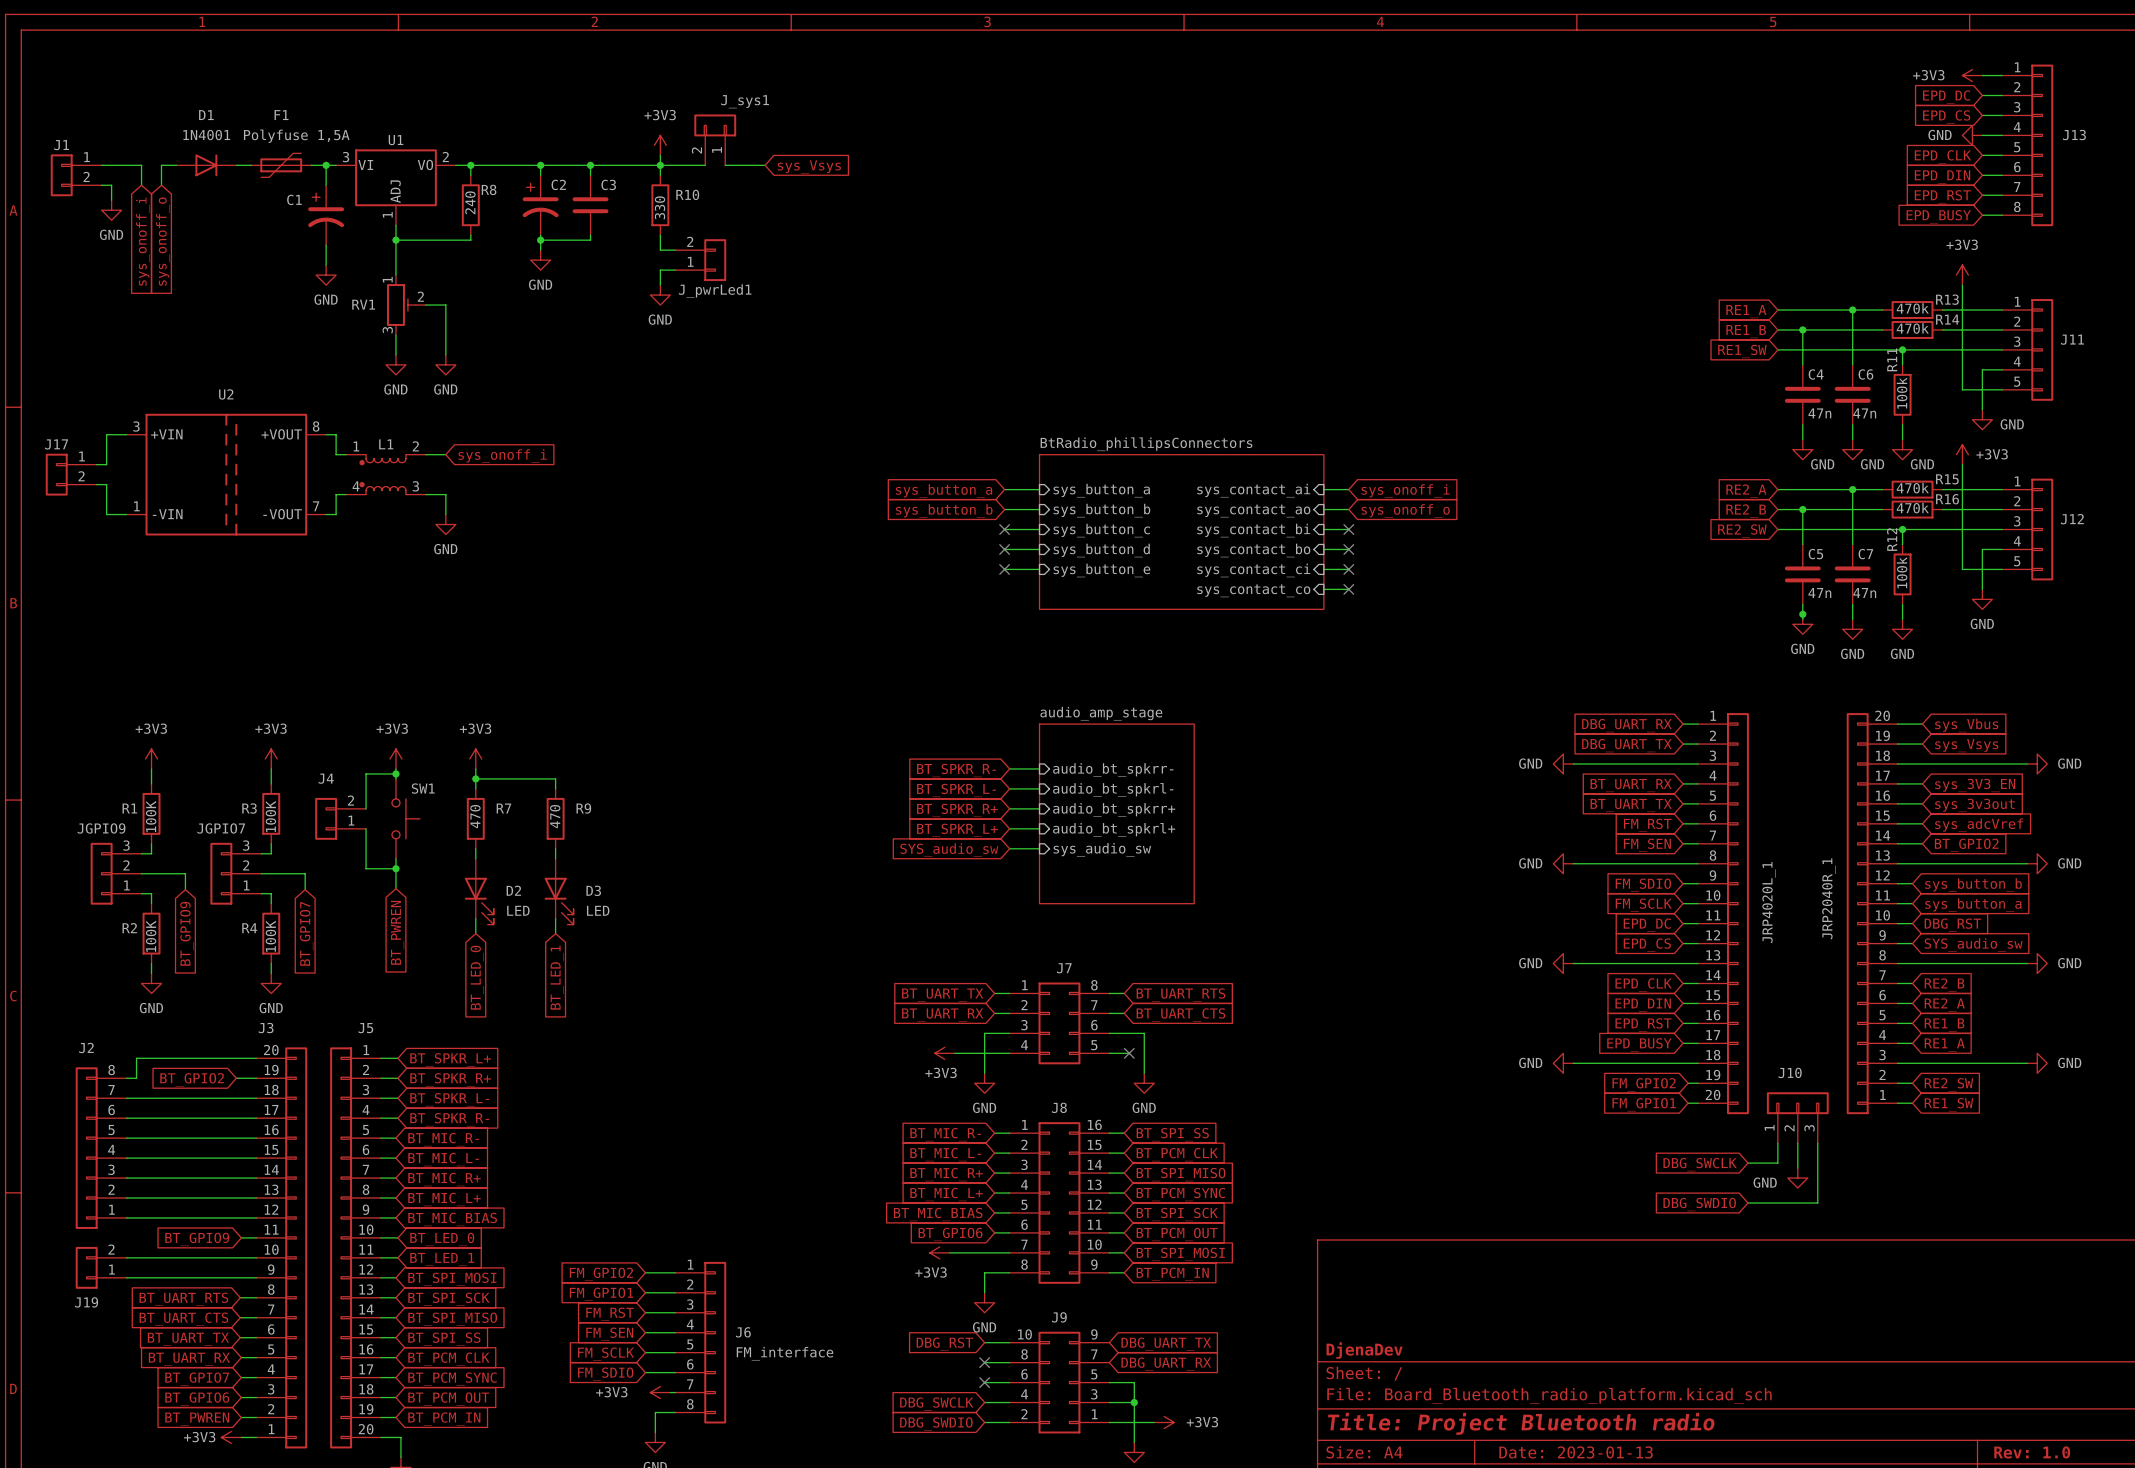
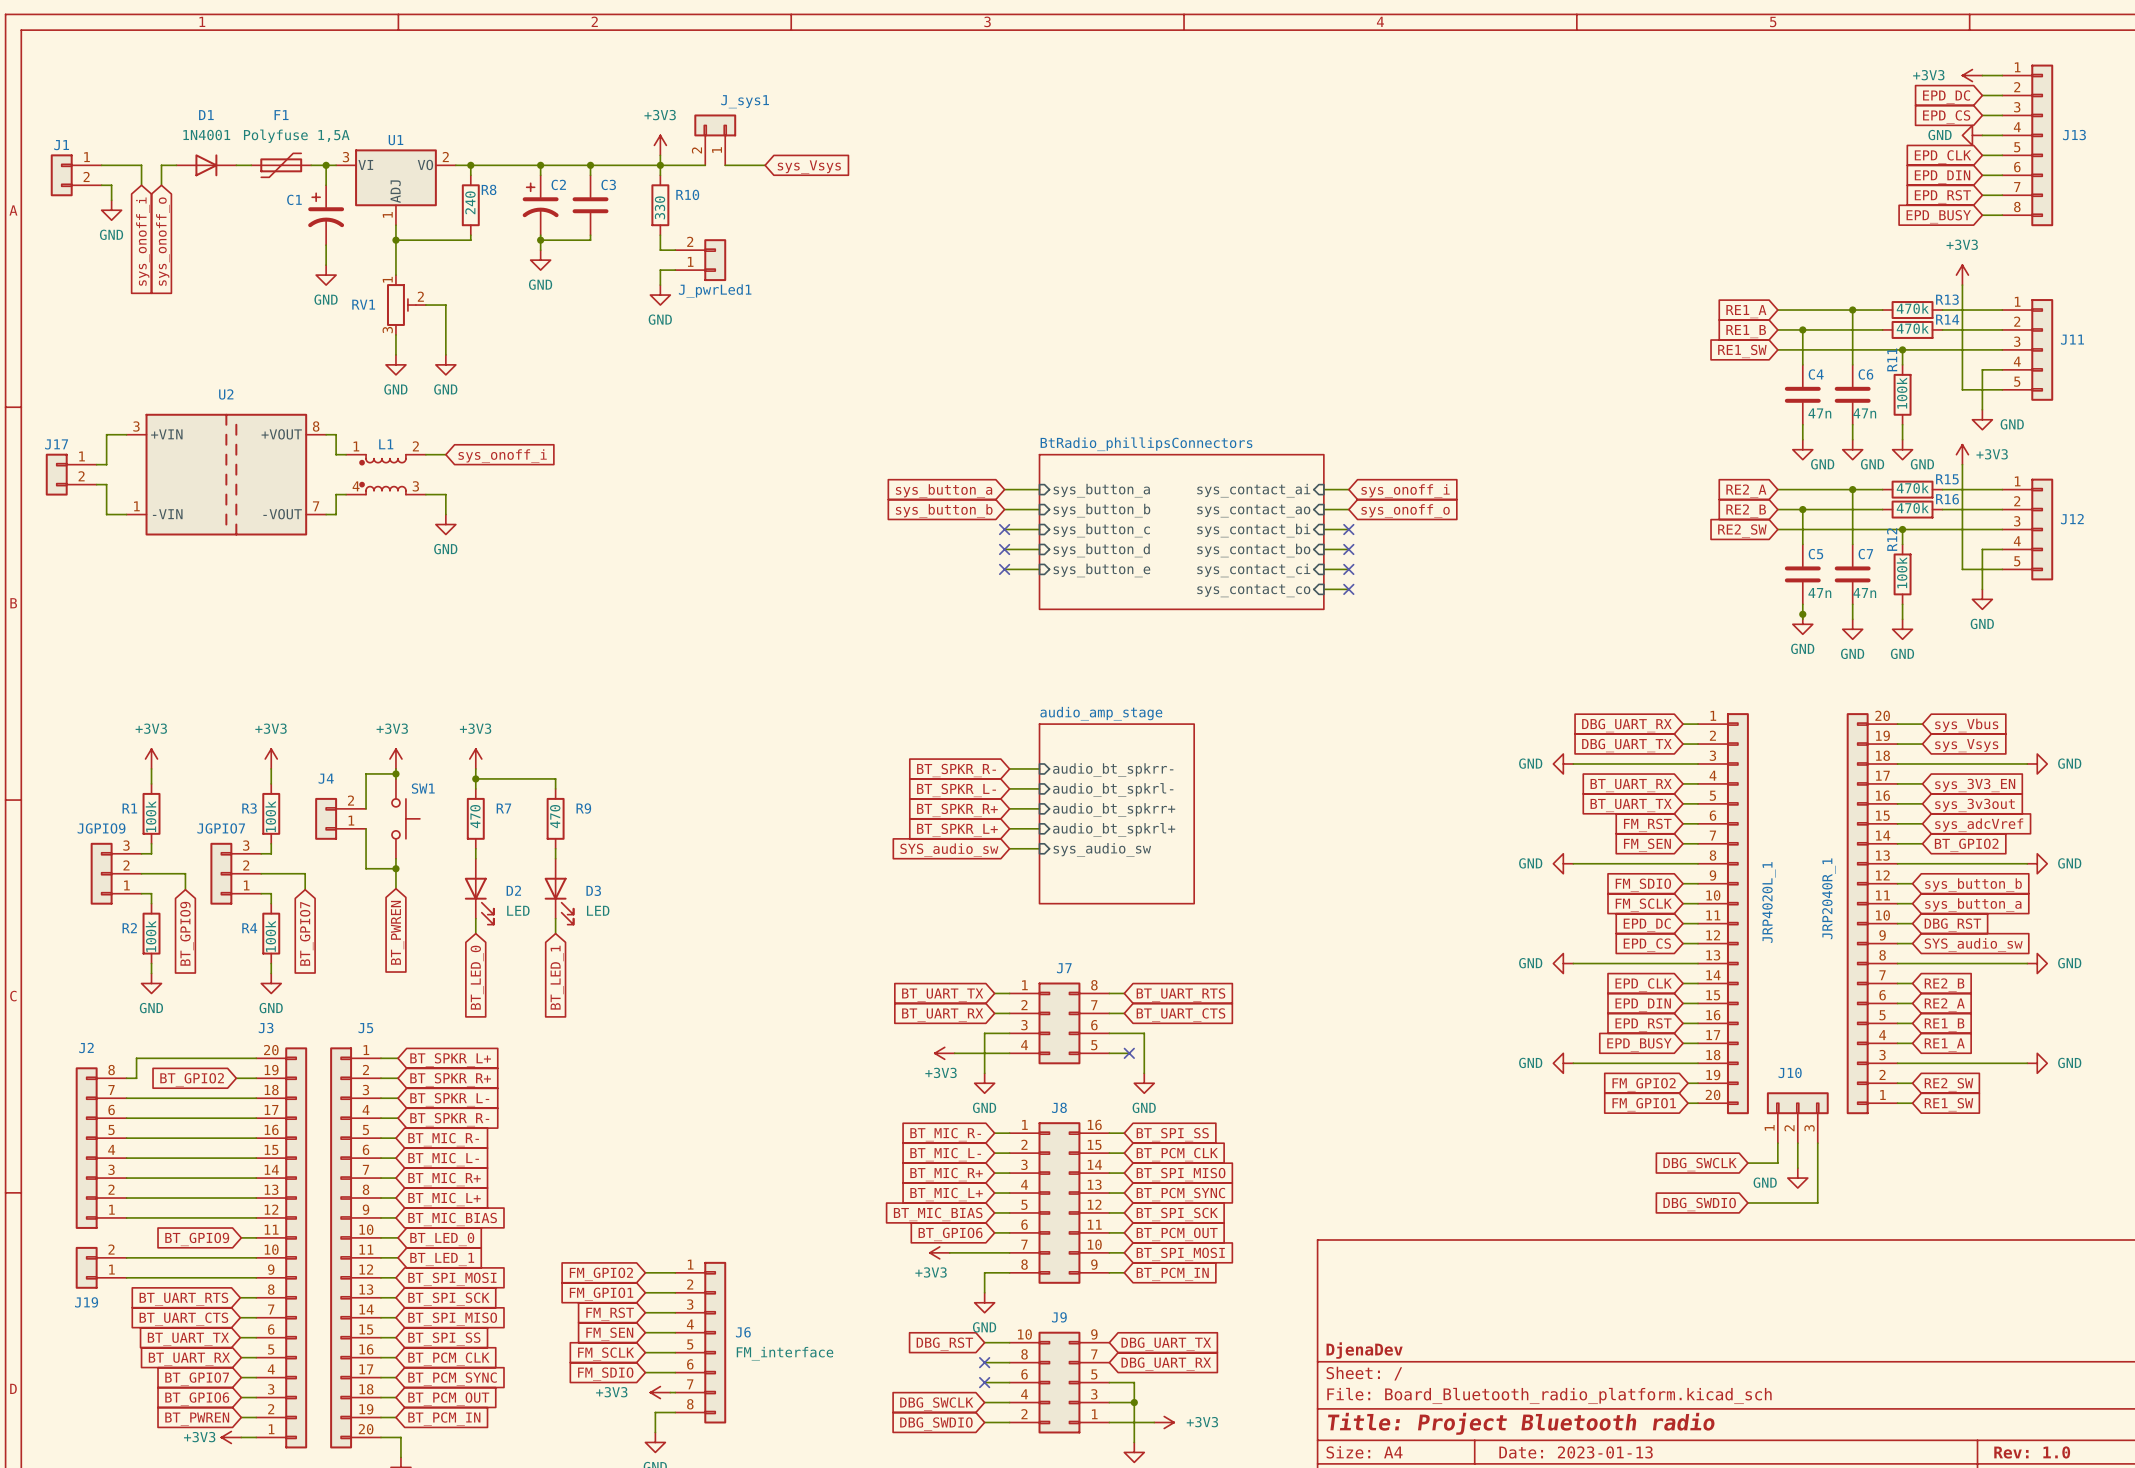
R1 value: 100K (151, 816) -> 100k (151, 816)
R3 value: 100K (270, 816) -> 100k (270, 816)
R2 value: 100K (151, 936) -> 100k (151, 936)
R4 value: 100K (270, 936) -> 100k (270, 936)

